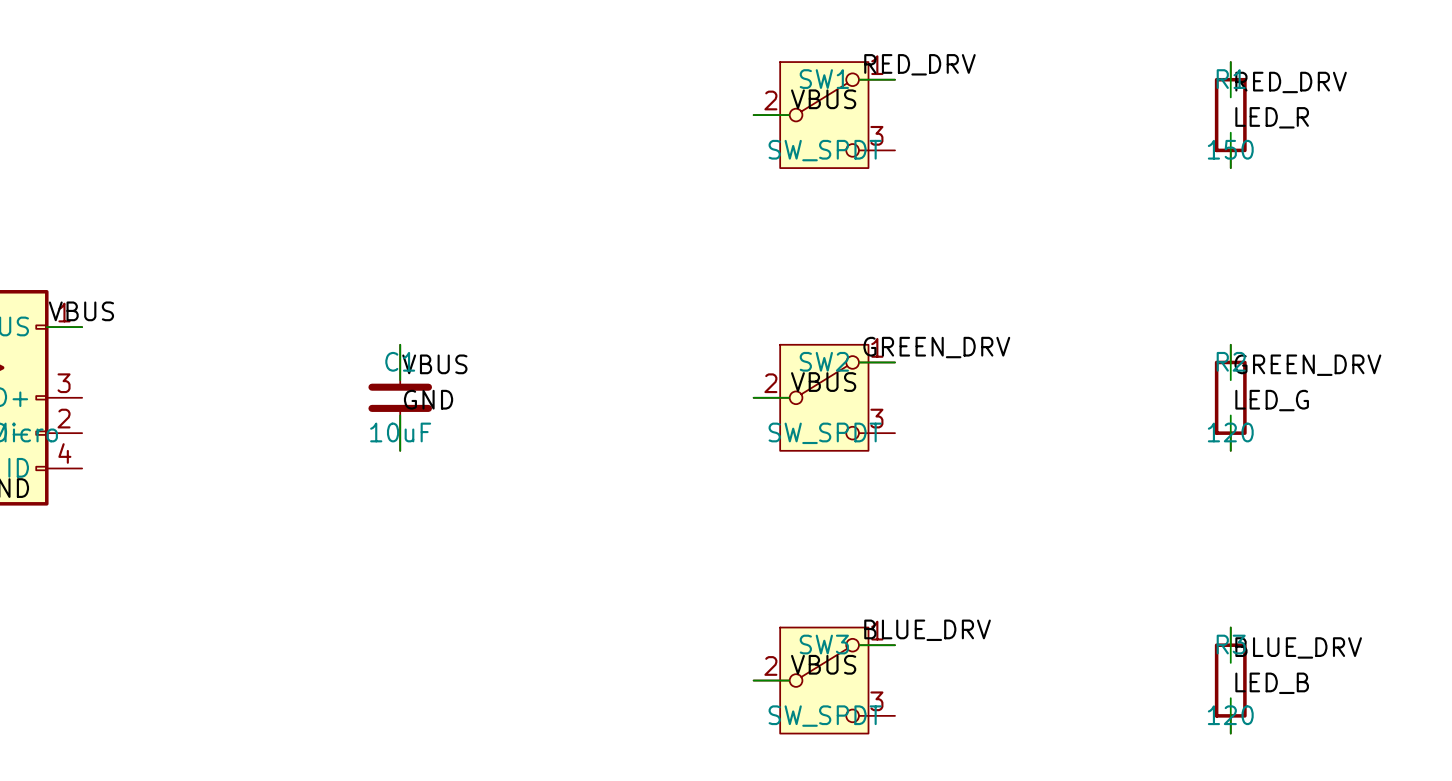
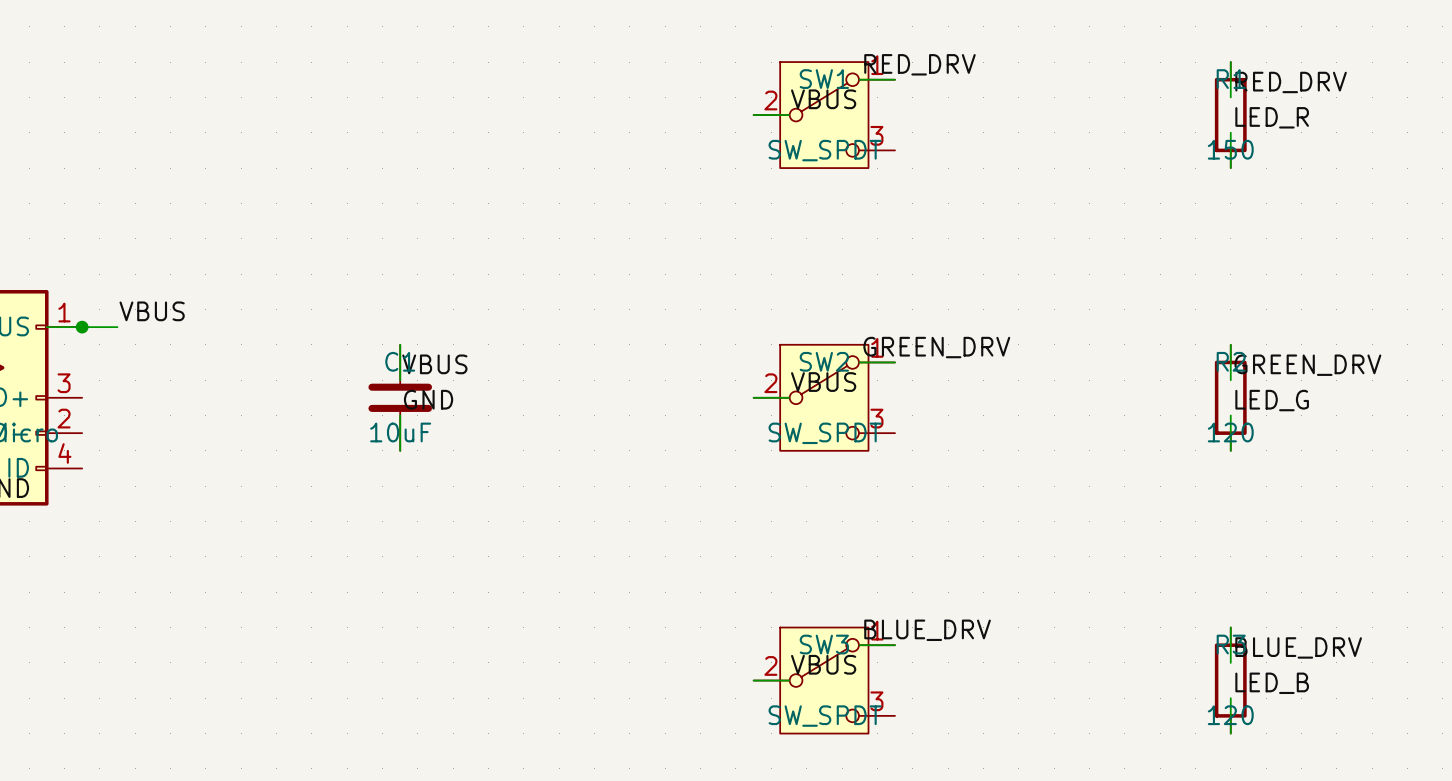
label position: VBUS (81, 311) -> VBUS (152, 311)
wire: none -> (82, 327) (117, 327)
junction: none -> (82, 327)

